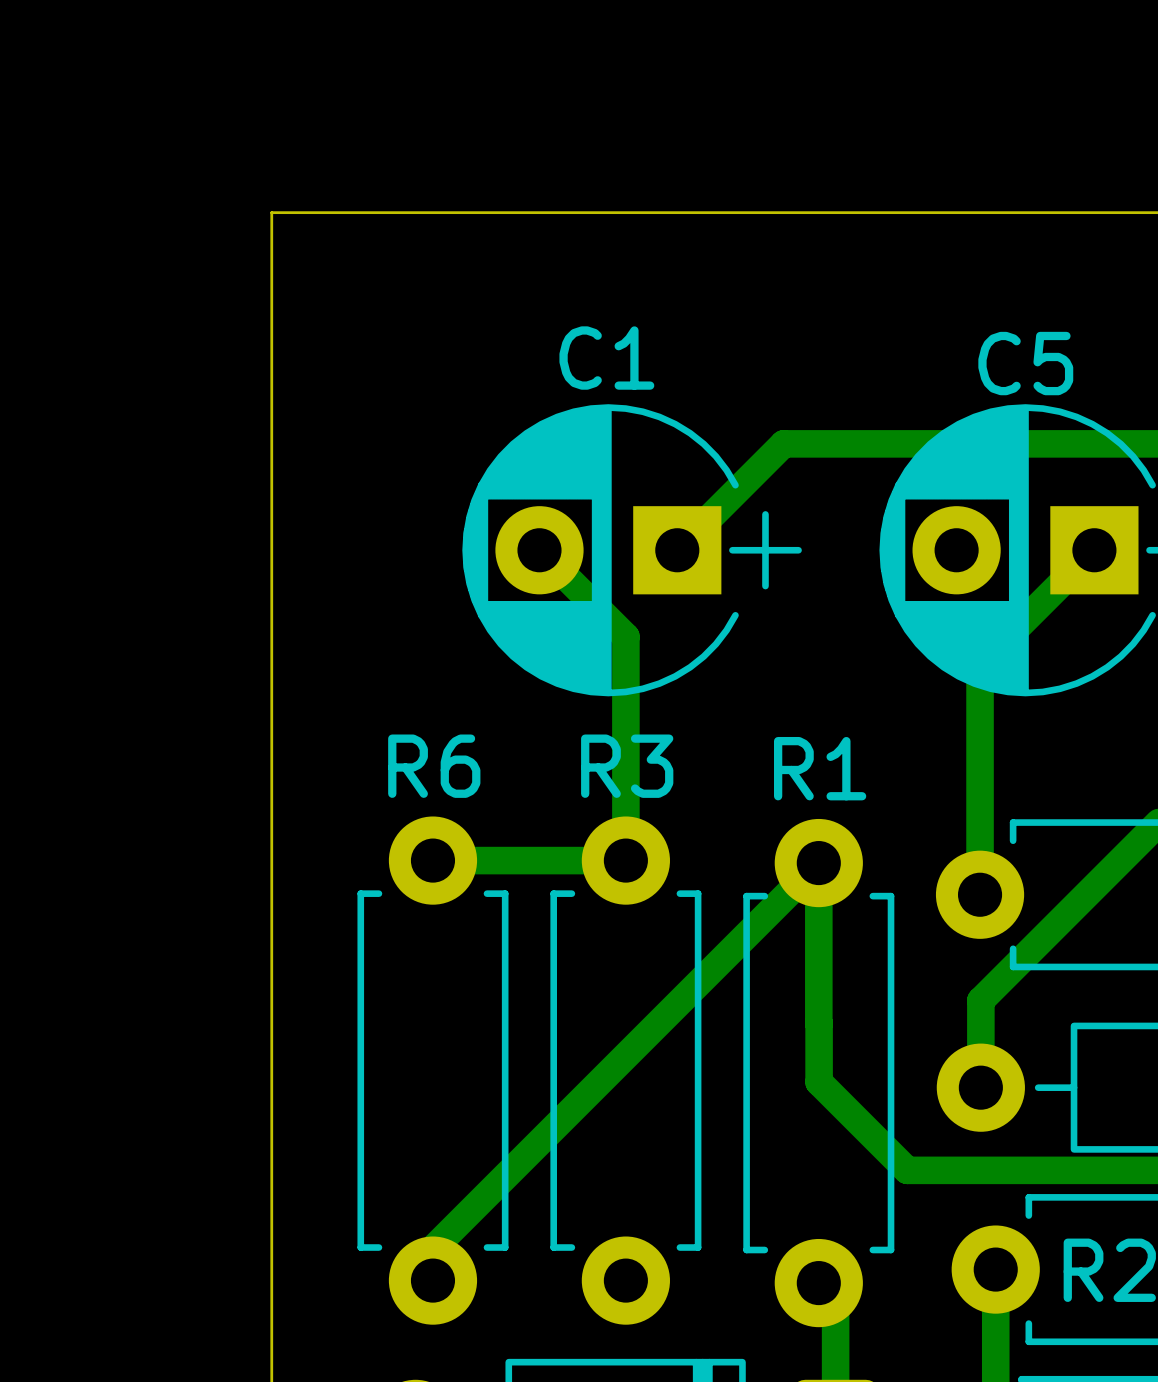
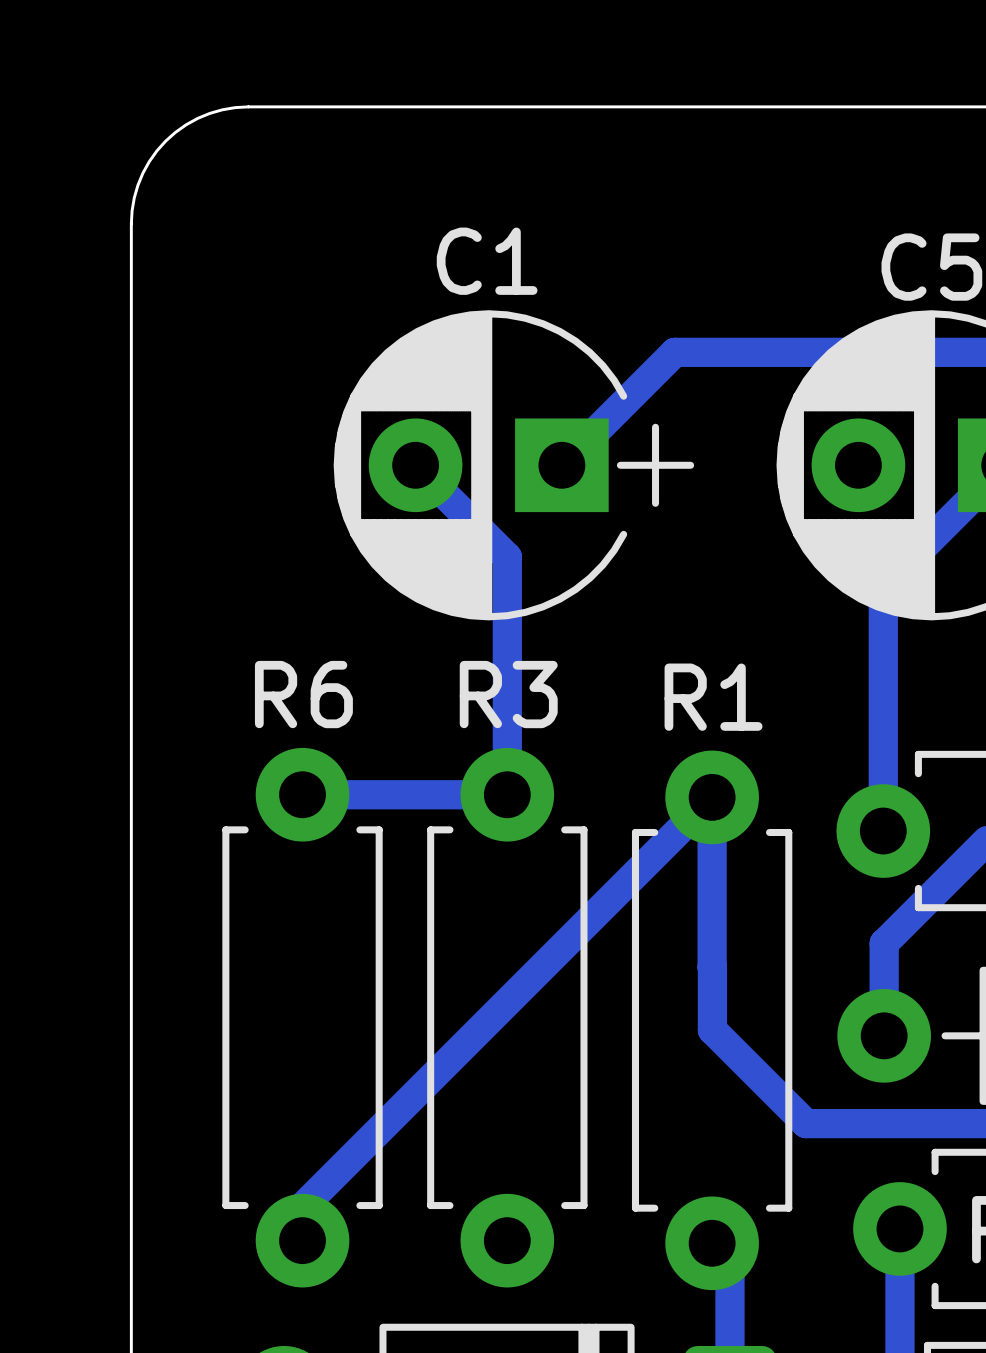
board edge: (381, 212) (271, 212) (271, 322) -> (248, 106) (222, 109) (197, 118) (165, 141) (142, 173) (134, 197) (131, 223)

